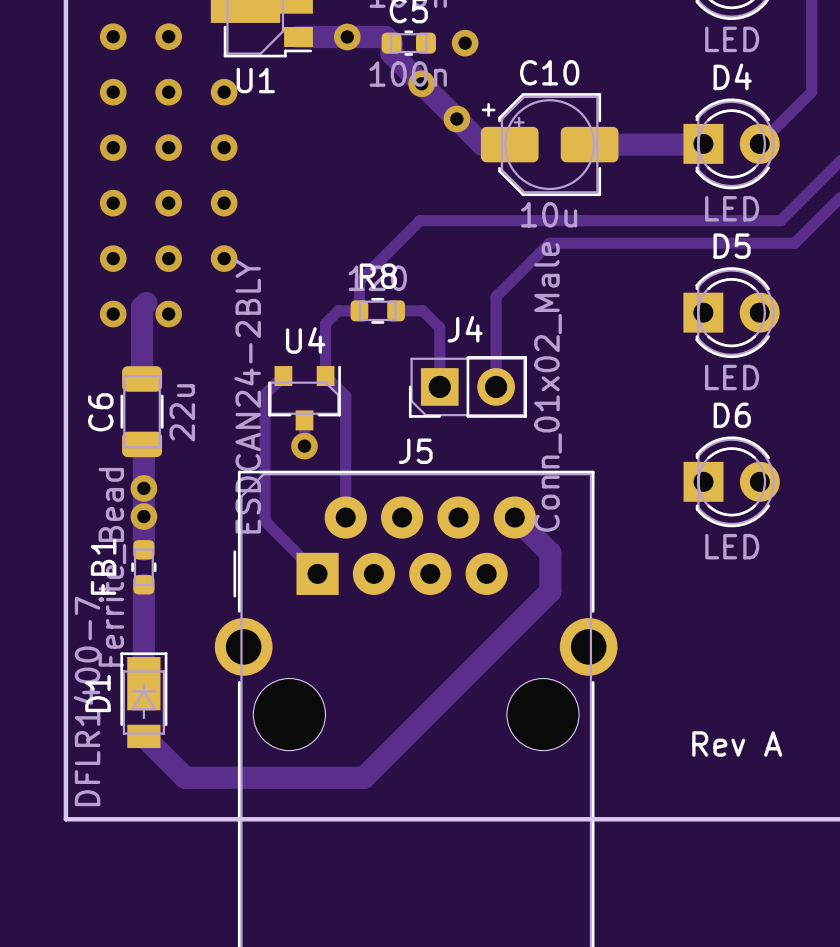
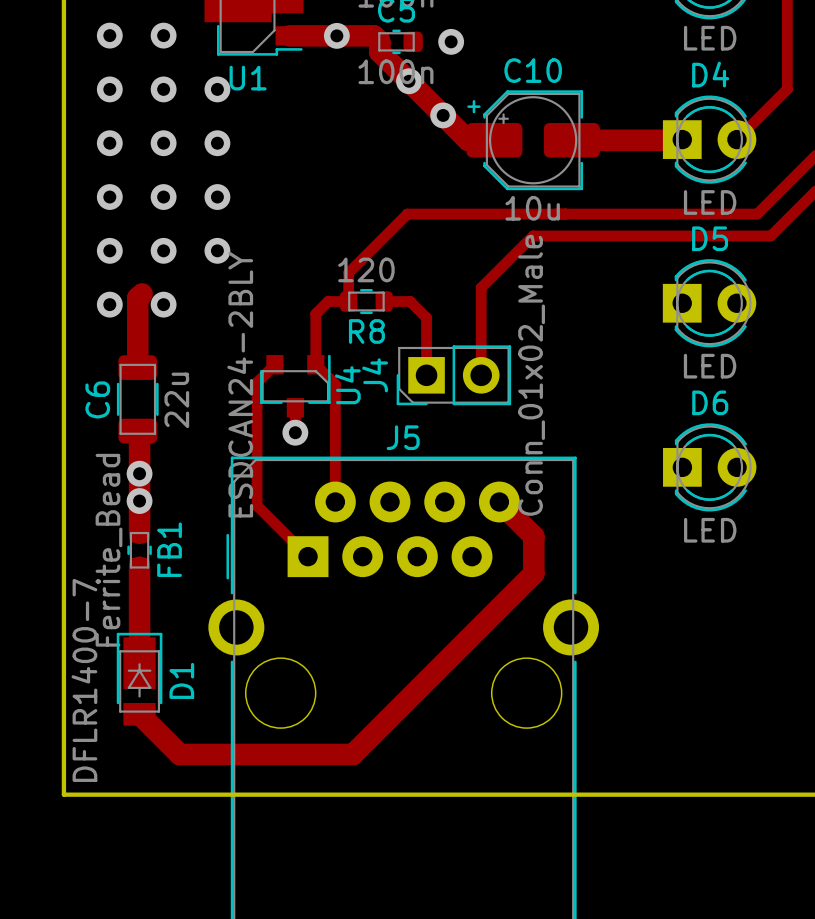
R8 name position: R8 (378, 276) -> R8 (366, 331)
J4 name rotation: 0° (465, 329) -> 90° counterclockwise (375, 375)
J4 name position: J4 (465, 329) -> J4 (375, 375)
U4 name rotation: 0° (305, 340) -> 90° counterclockwise (347, 385)
U4 name position: U4 (305, 340) -> U4 (347, 385)
FB1 name position: FB1 (103, 566) -> FB1 (169, 549)
D1 name position: D1 (97, 693) -> D1 (181, 680)
text: Rev A (737, 743) -> none

